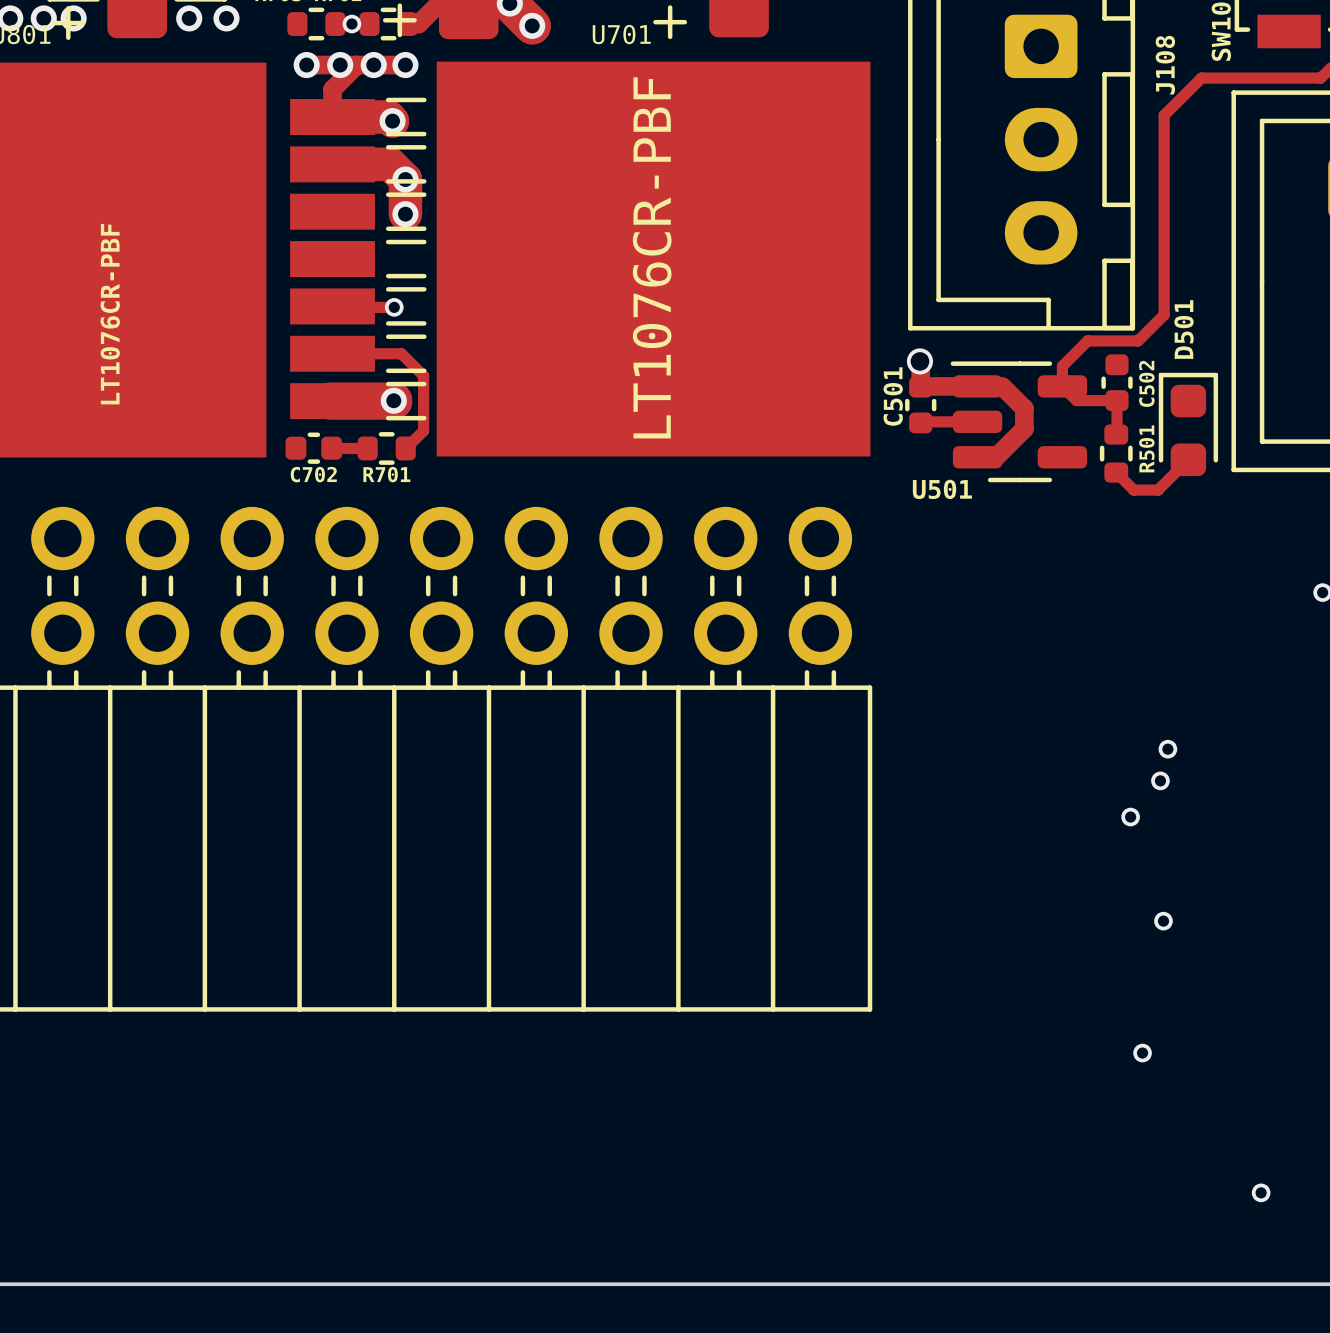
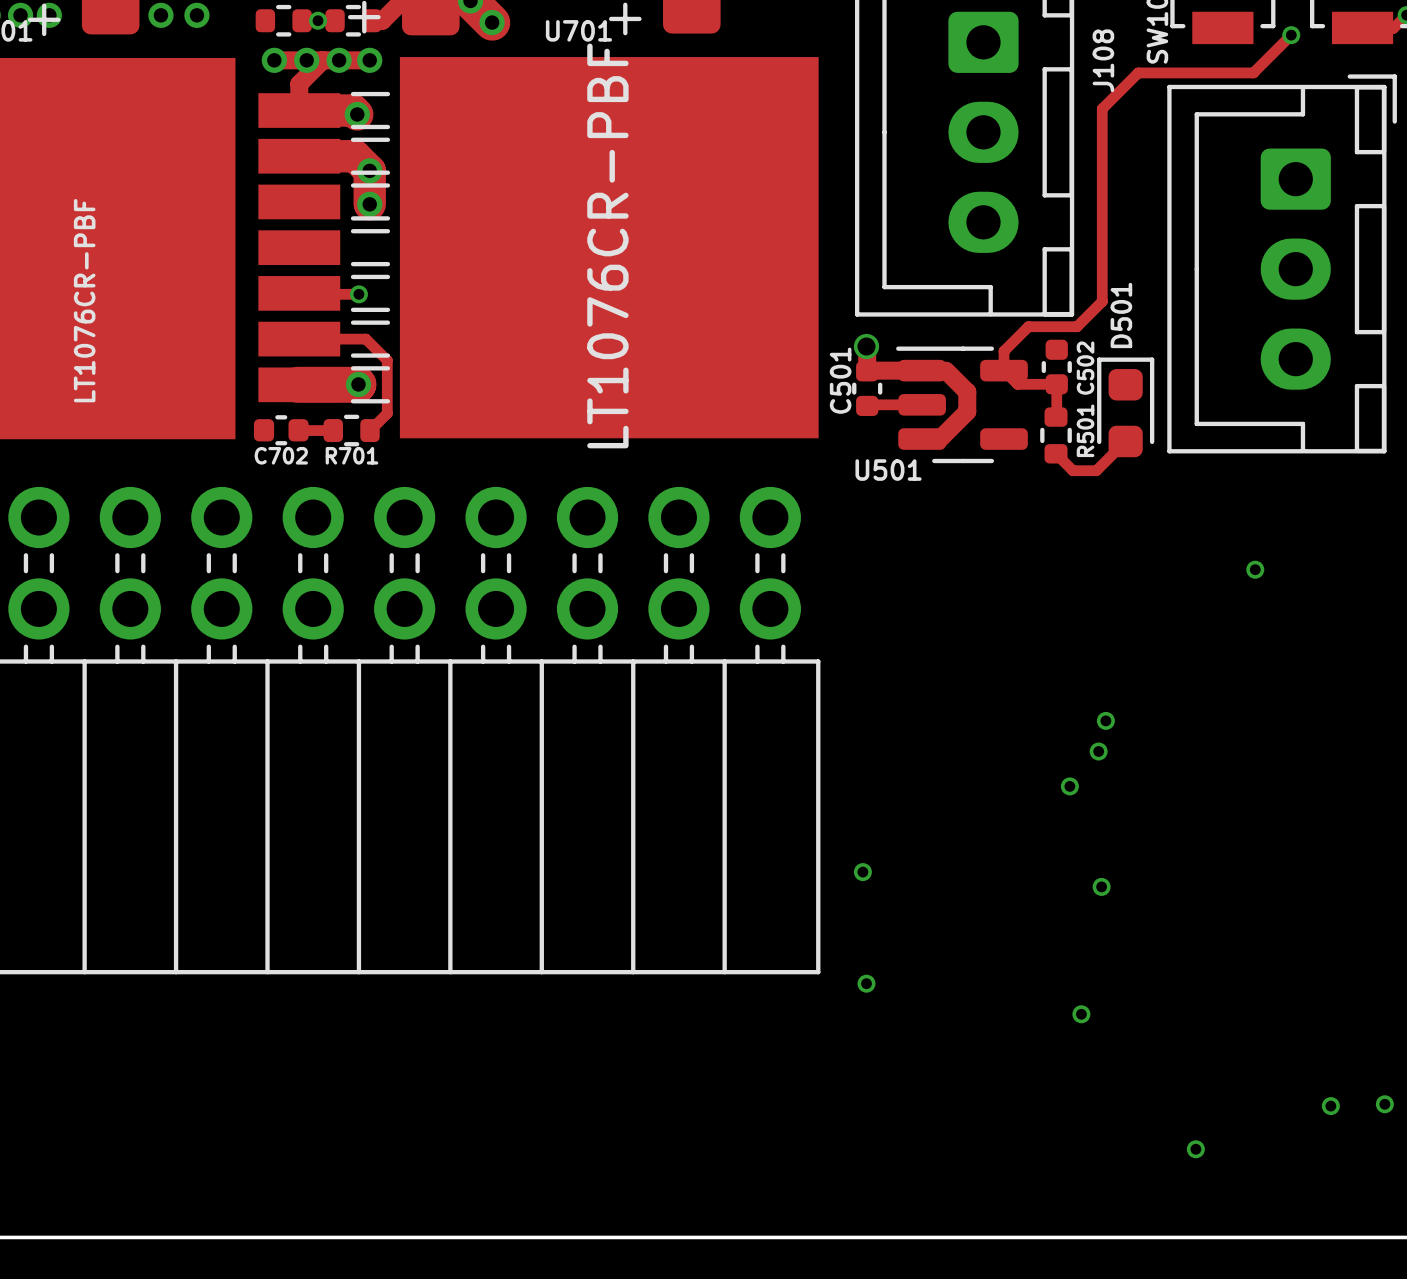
via: none -> (862, 872)
via: none -> (866, 983)

